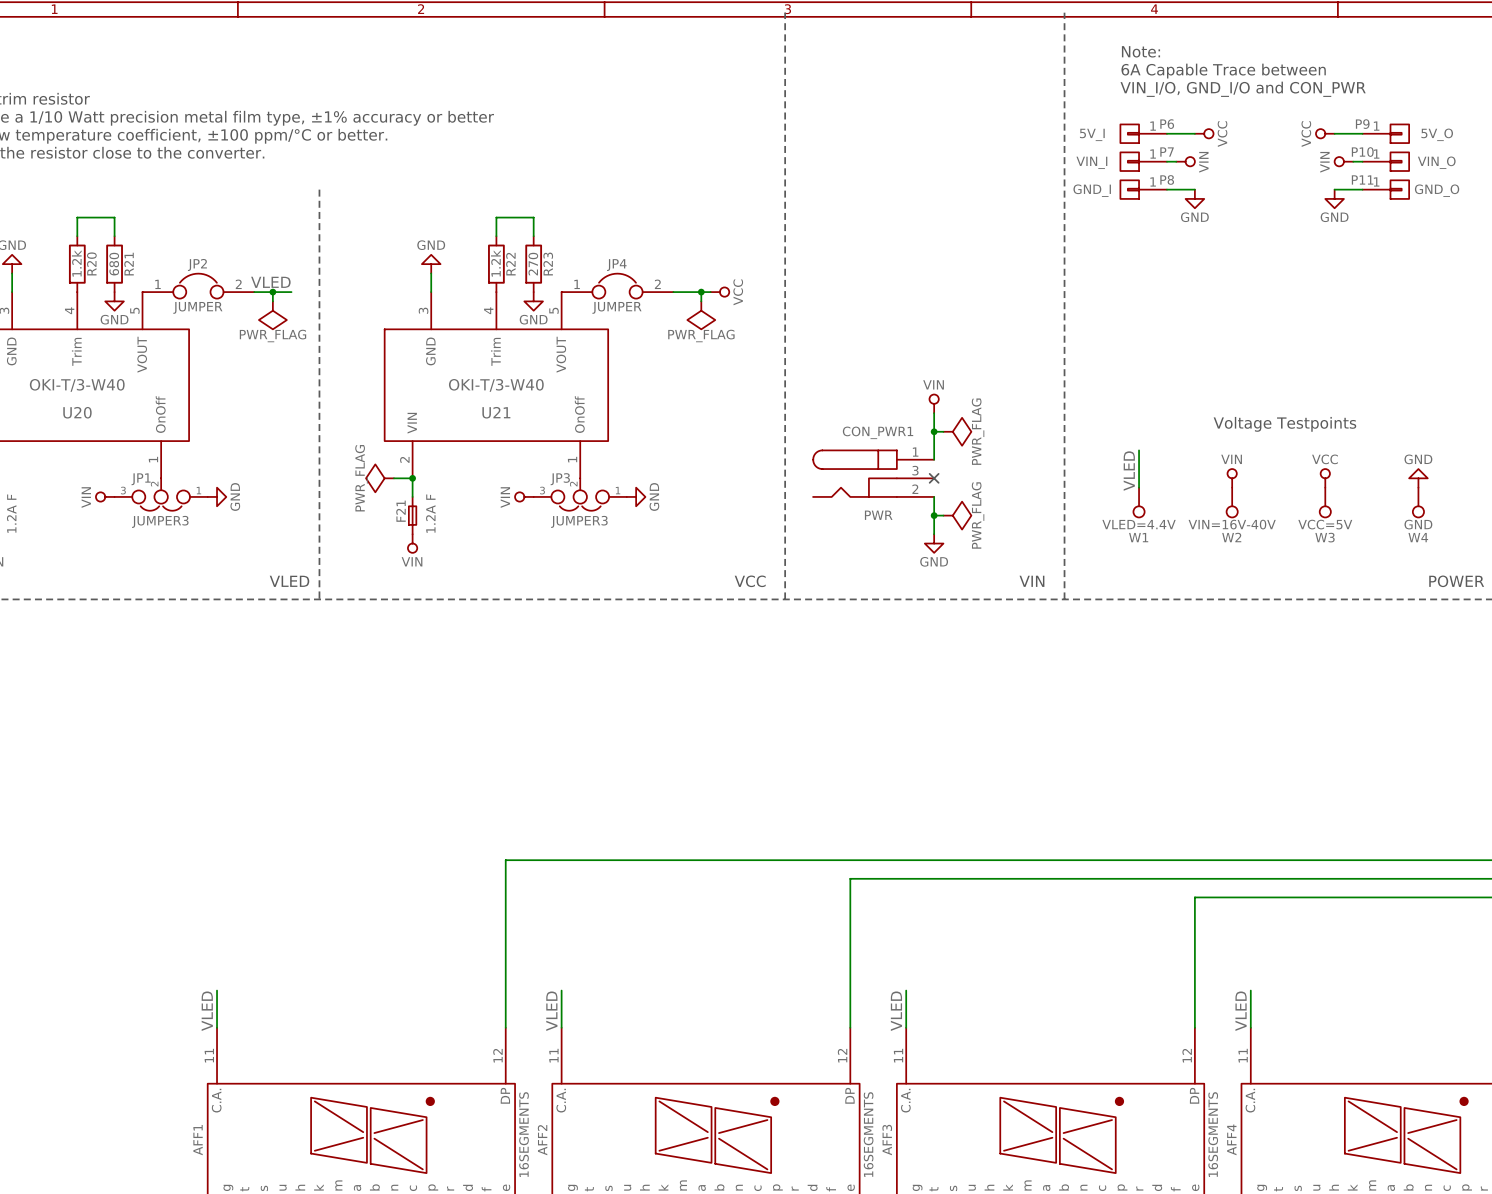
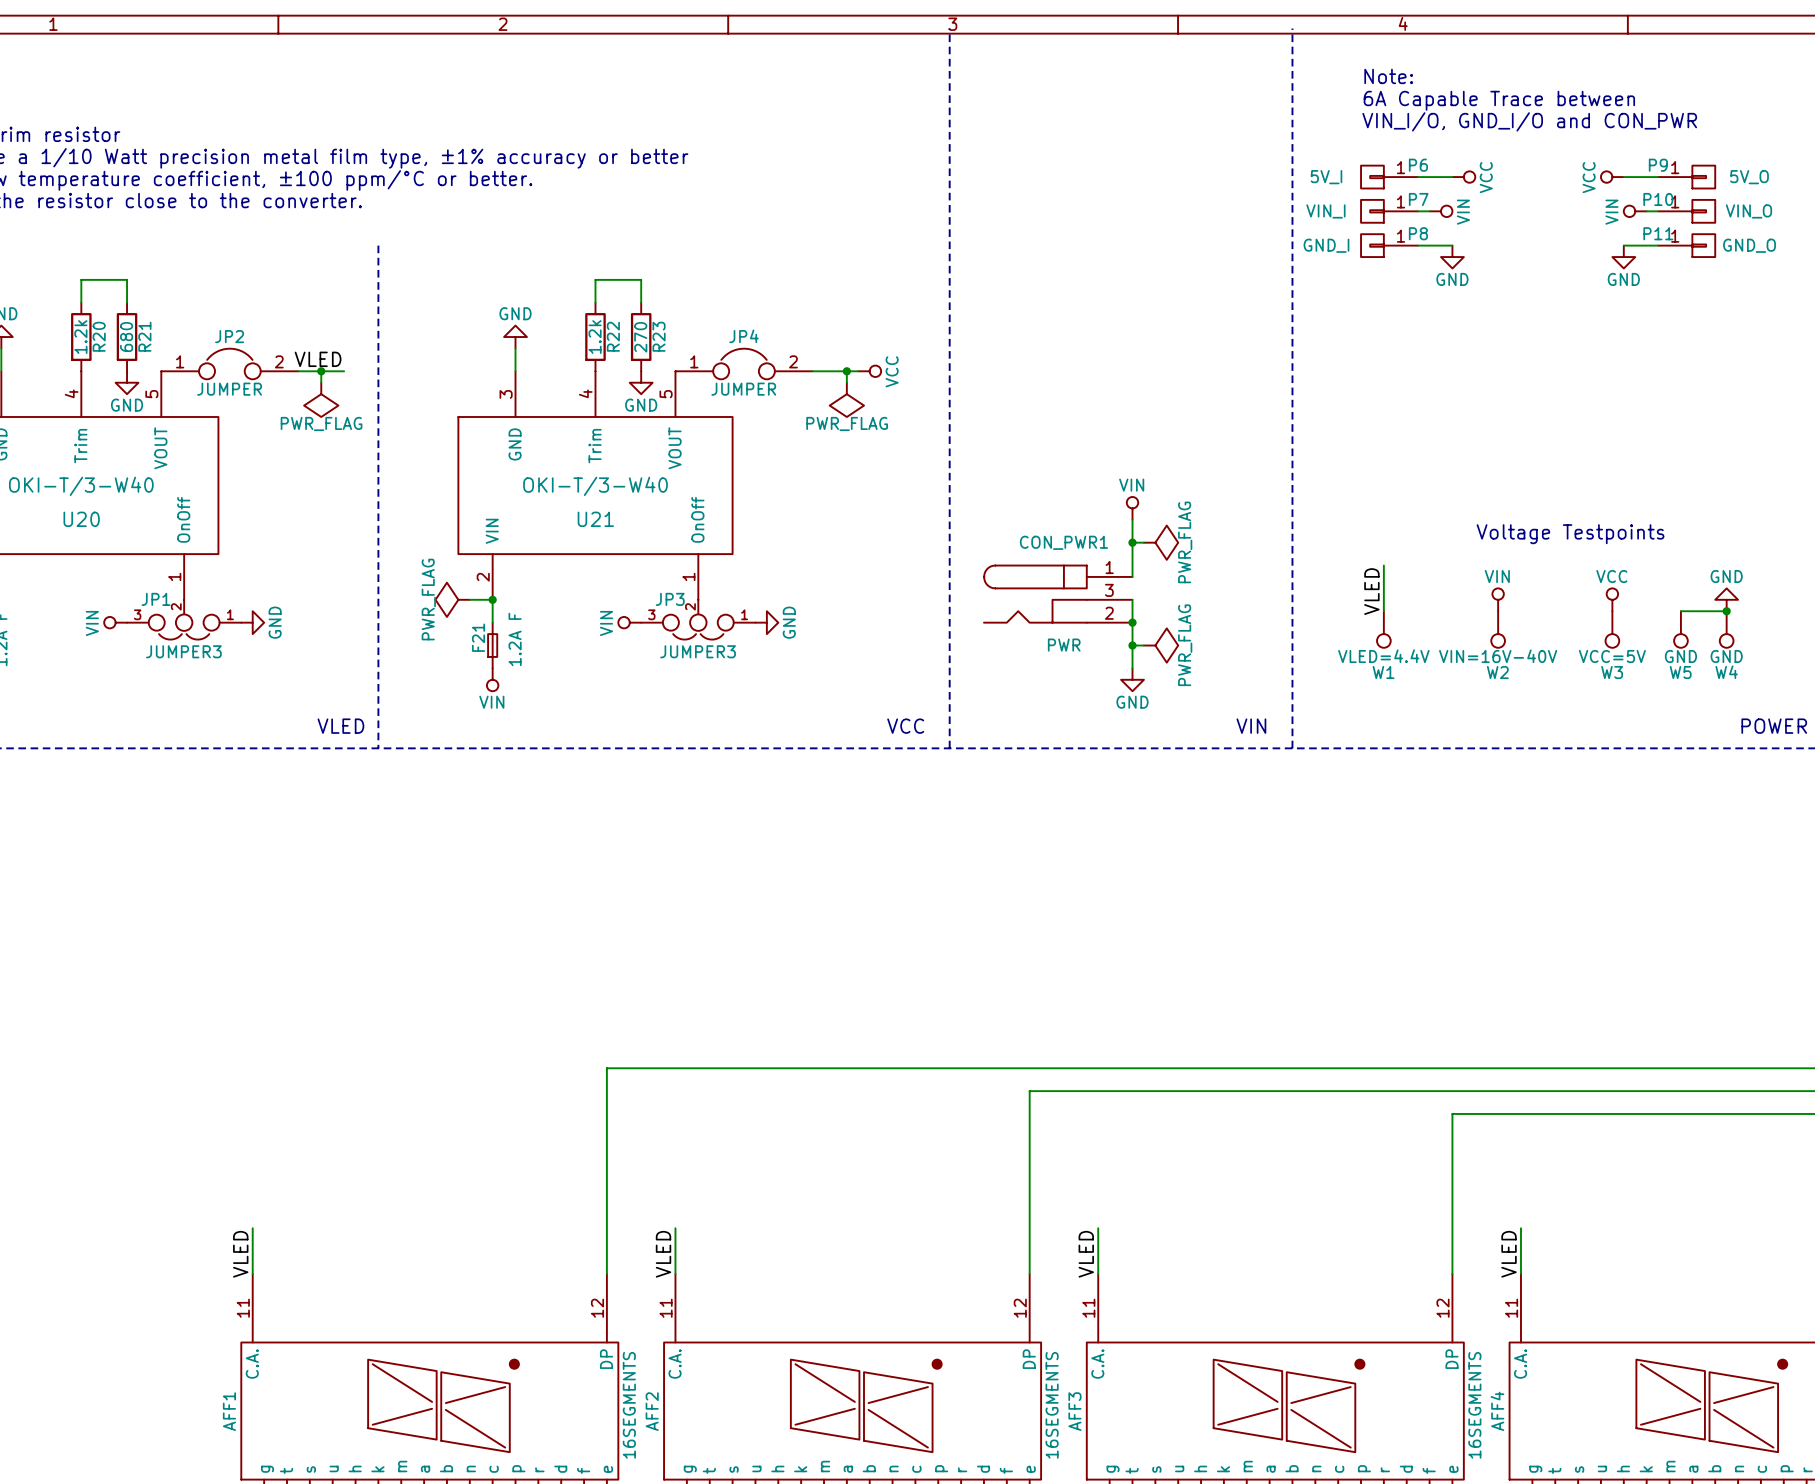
wire: none -> (1132, 599) (1132, 622)
no-connect mark: (934, 478) -> none
wire: none -> (1680, 611) (1726, 611)
junction: none -> (1726, 611)
junction: none -> (1132, 622)
W5: none -> GND (1680, 629)

